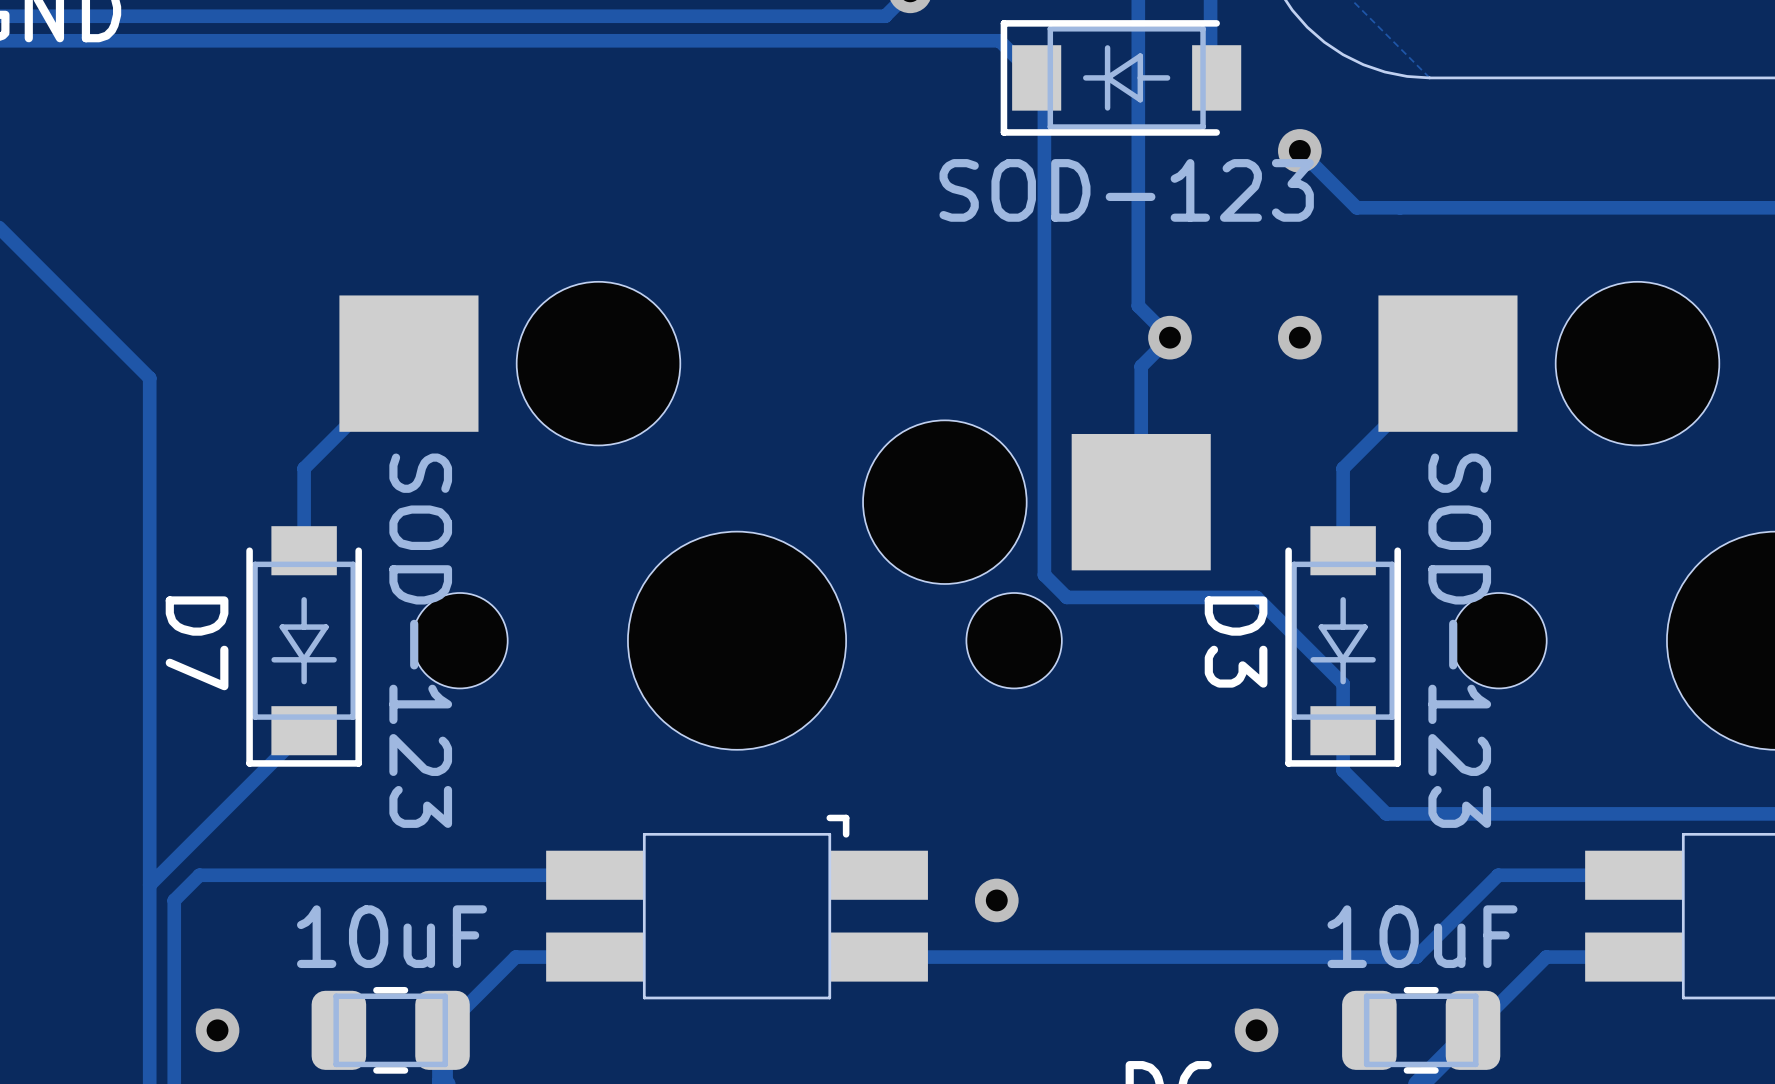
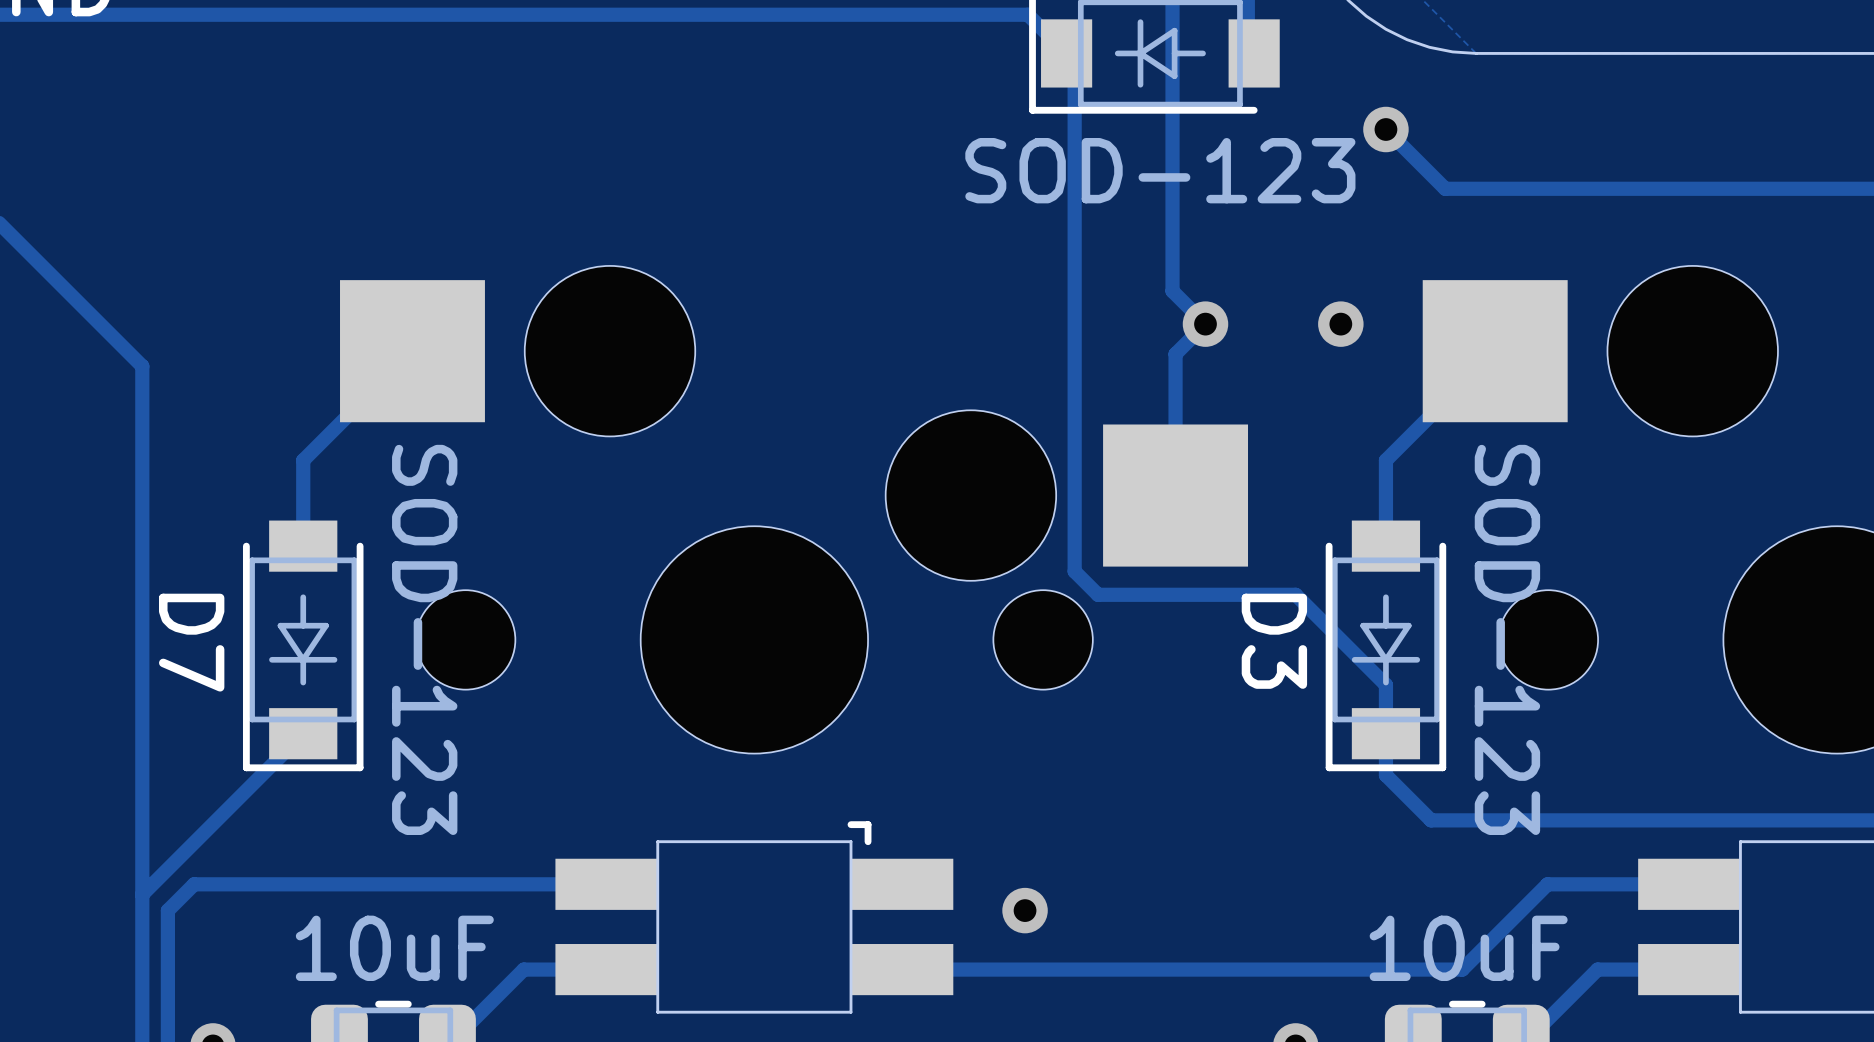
track: (1299, 150) (1356, 207) (1400, 207) -> (1385, 129) (1445, 188)
via position: (1299, 150) -> (1385, 129)

